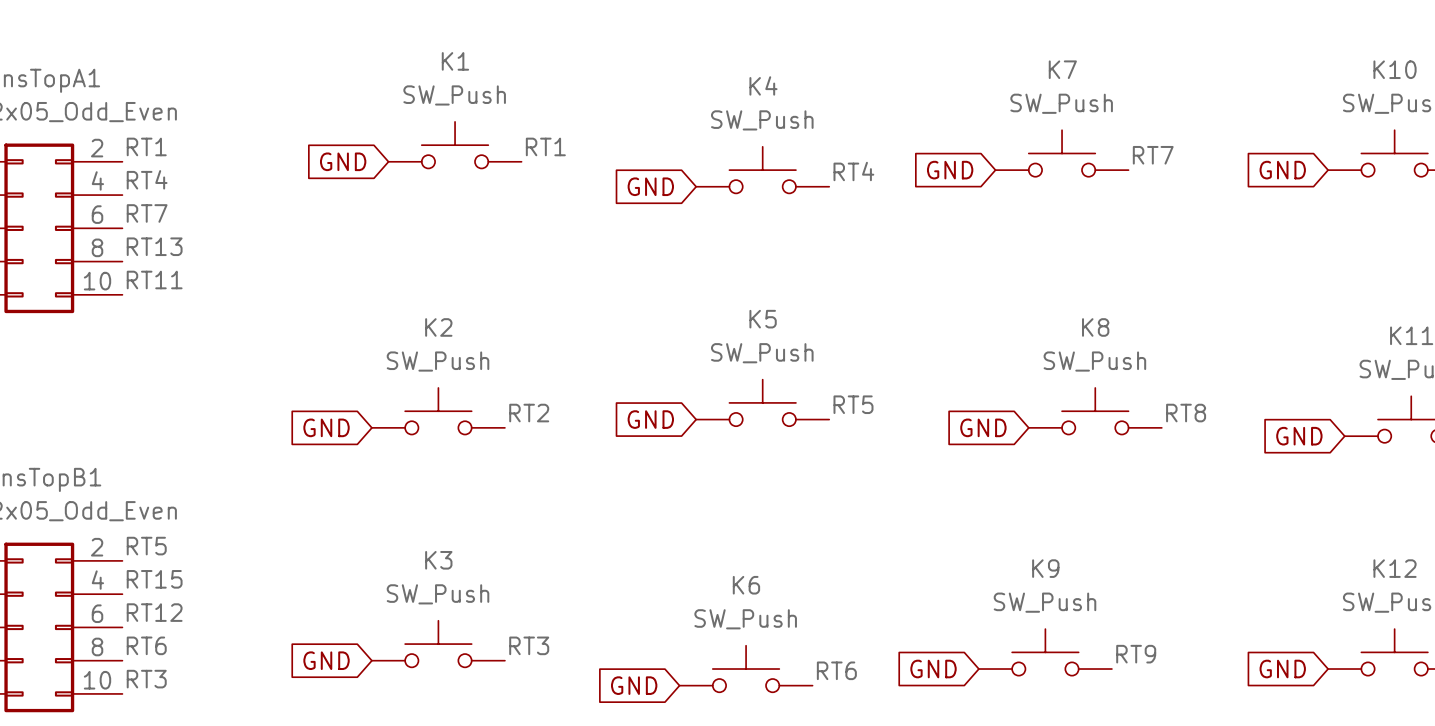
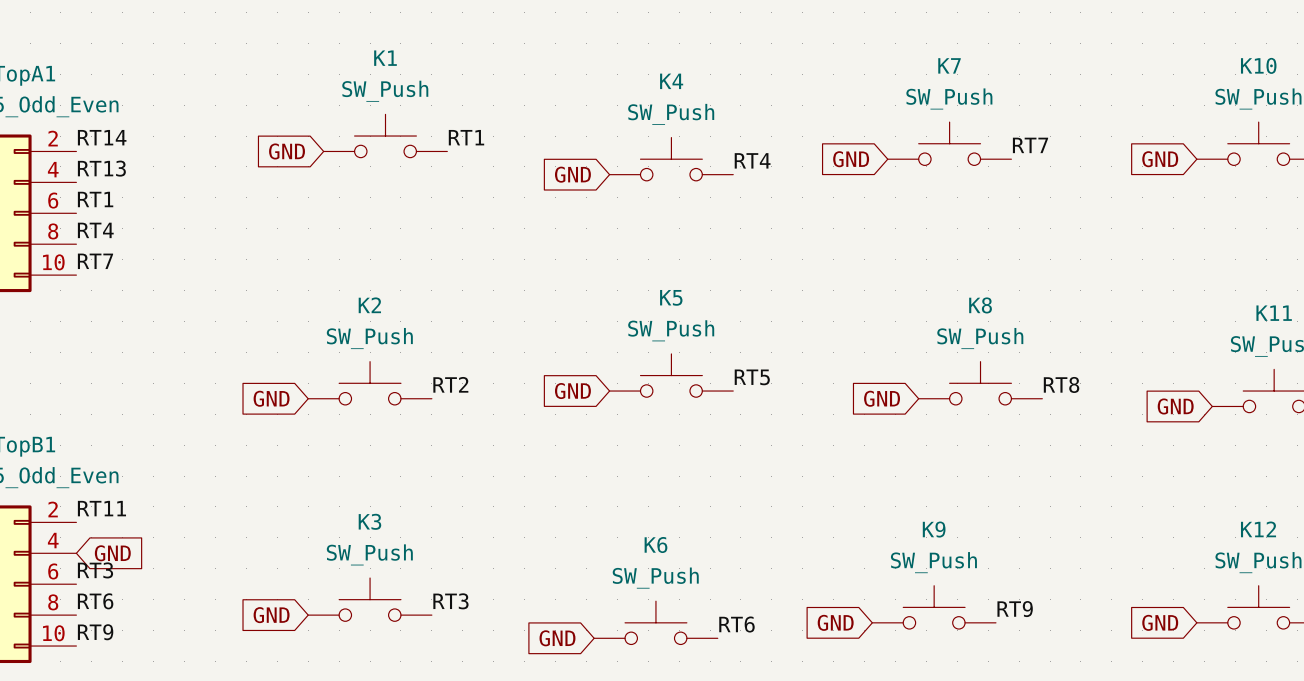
label: RT1 (146, 146) -> RT14 (102, 137)
label: RT4 (147, 179) -> RT13 (101, 168)
label: RT7 (147, 213) -> RT1 (95, 199)
label: RT13 (154, 246) -> RT4 (95, 230)
label: RT11 (154, 279) -> RT7 (95, 261)
label: RT5 (146, 546) -> RT11 (101, 508)
label: RT15 (154, 579) -> none
global label: none -> GND (112, 553)
label: RT12 (154, 612) -> RT3 (95, 570)
label: RT3 (146, 679) -> RT9 (95, 632)

